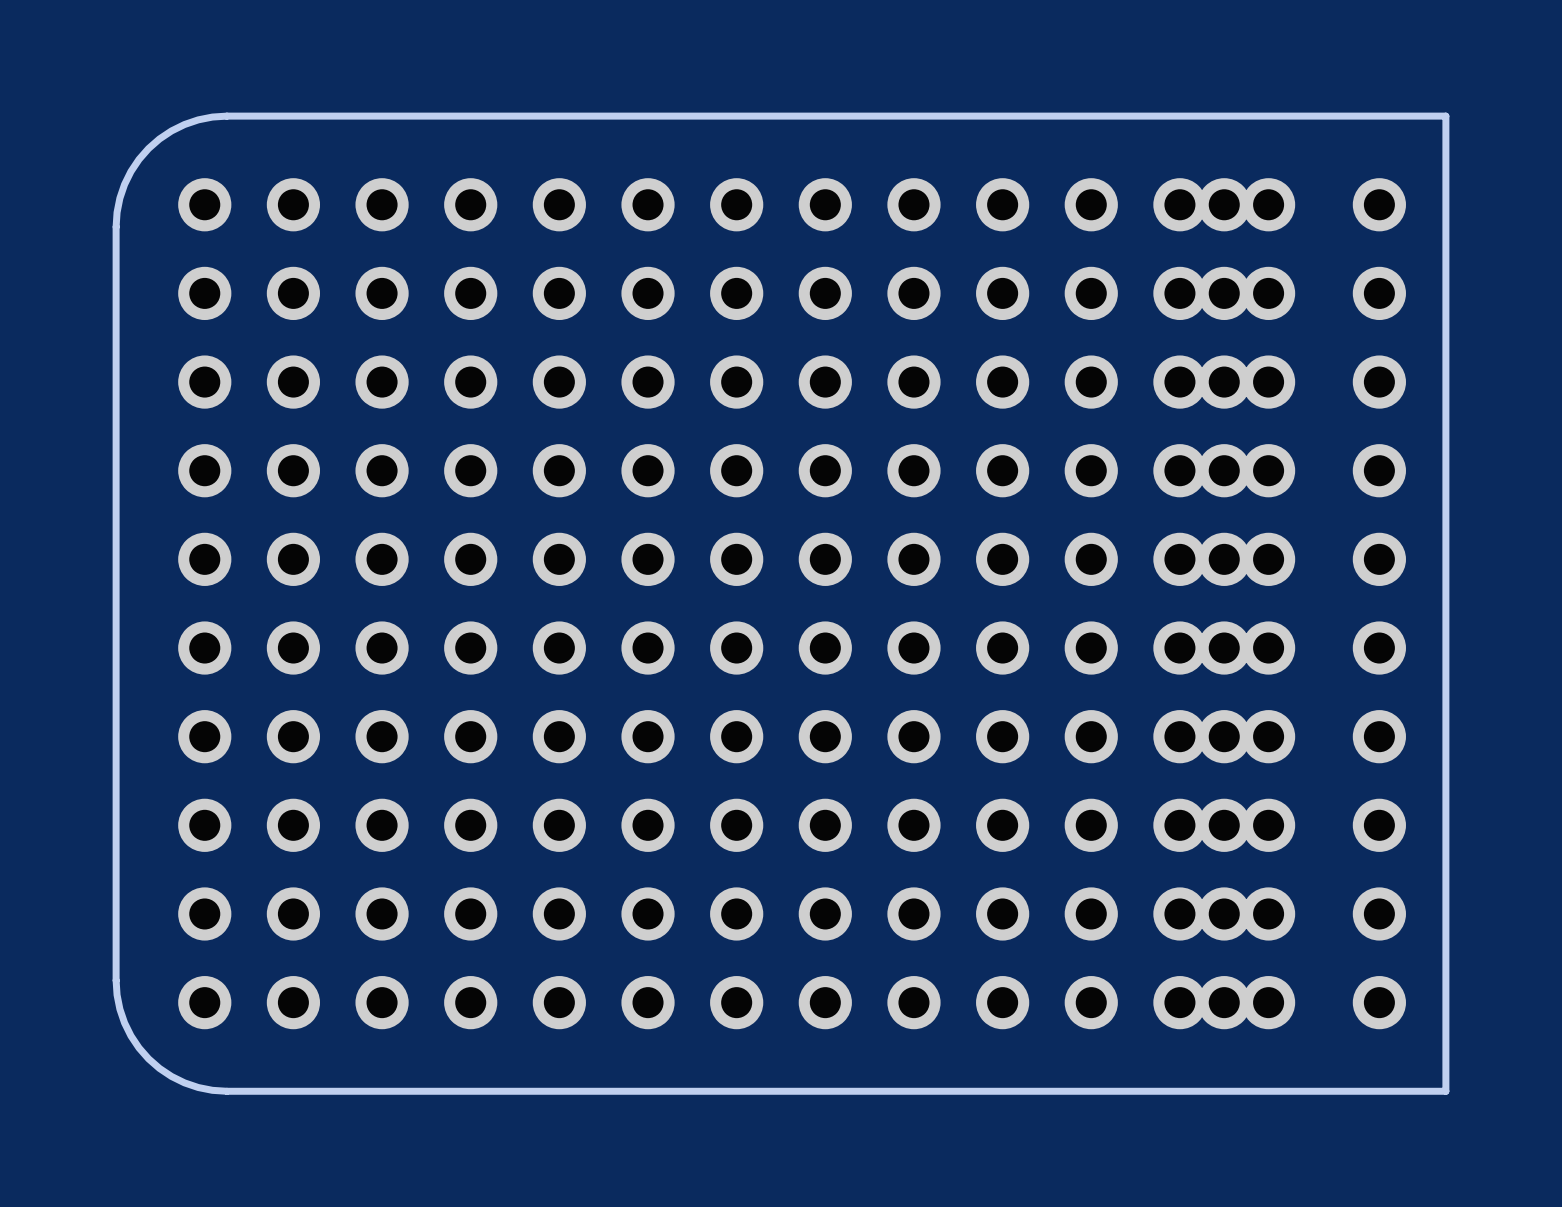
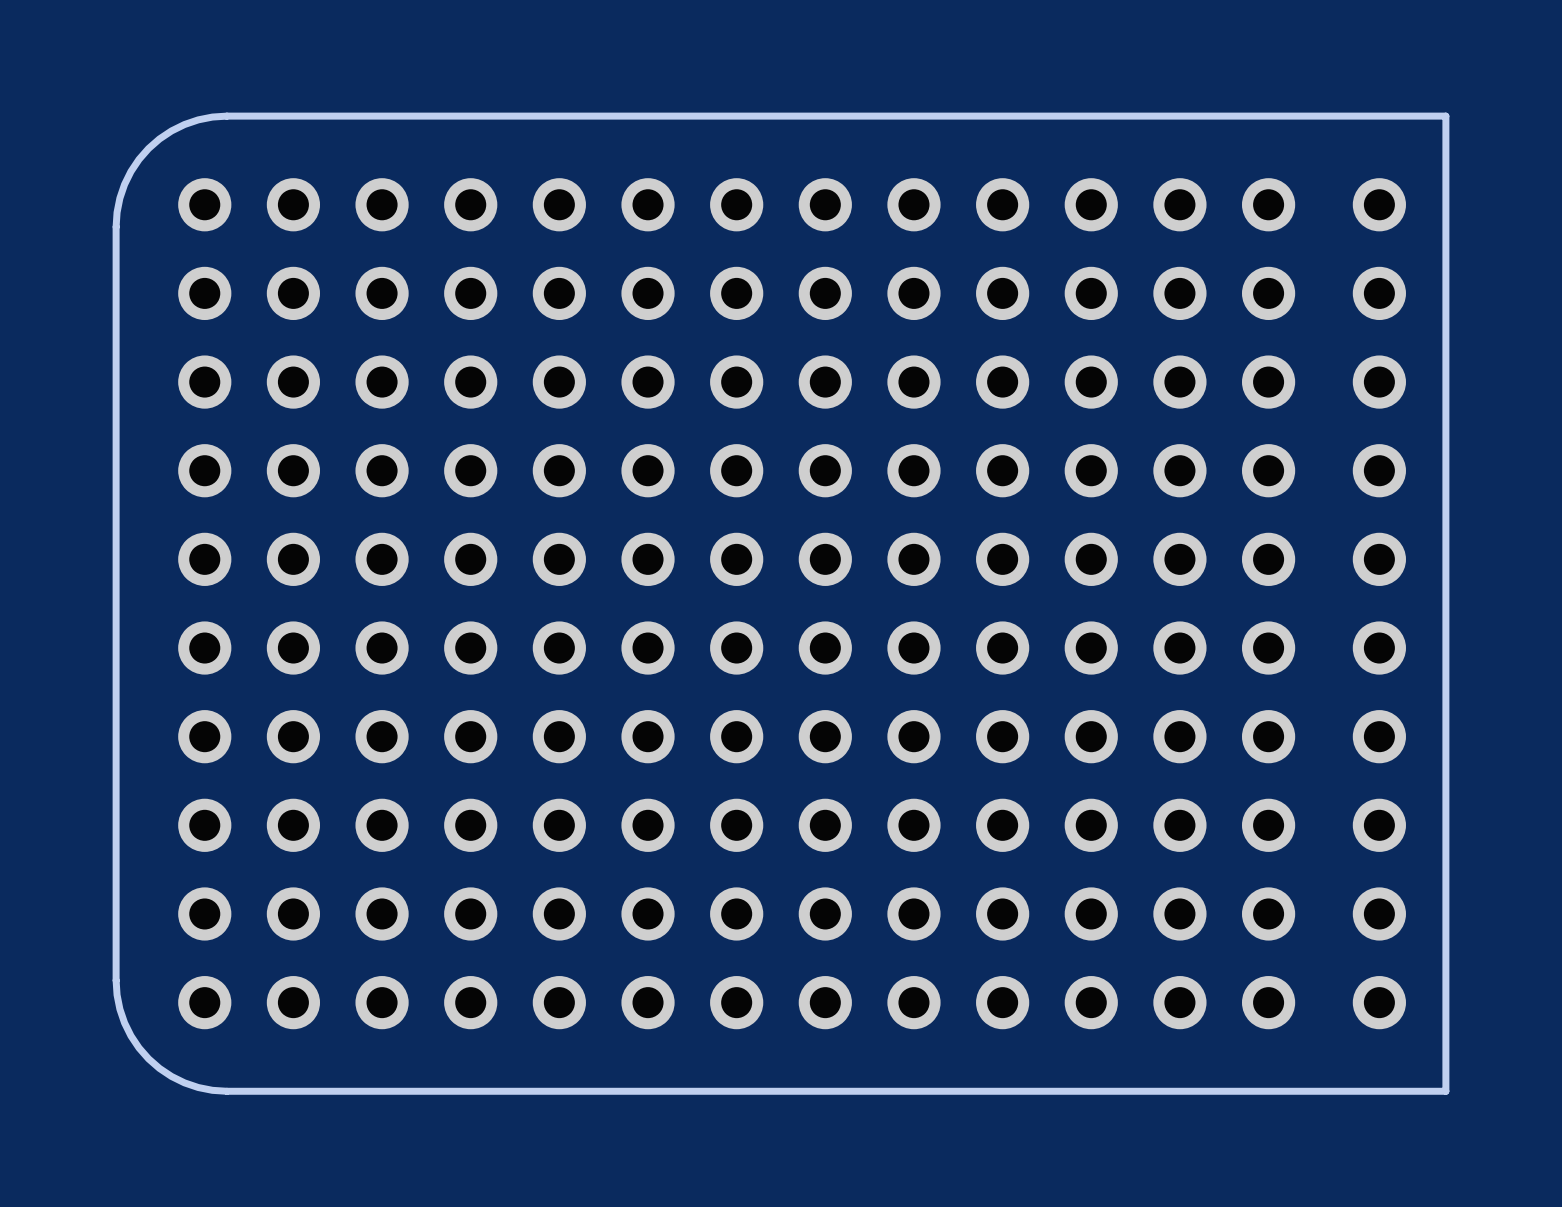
part: (1224, 603) -> none

